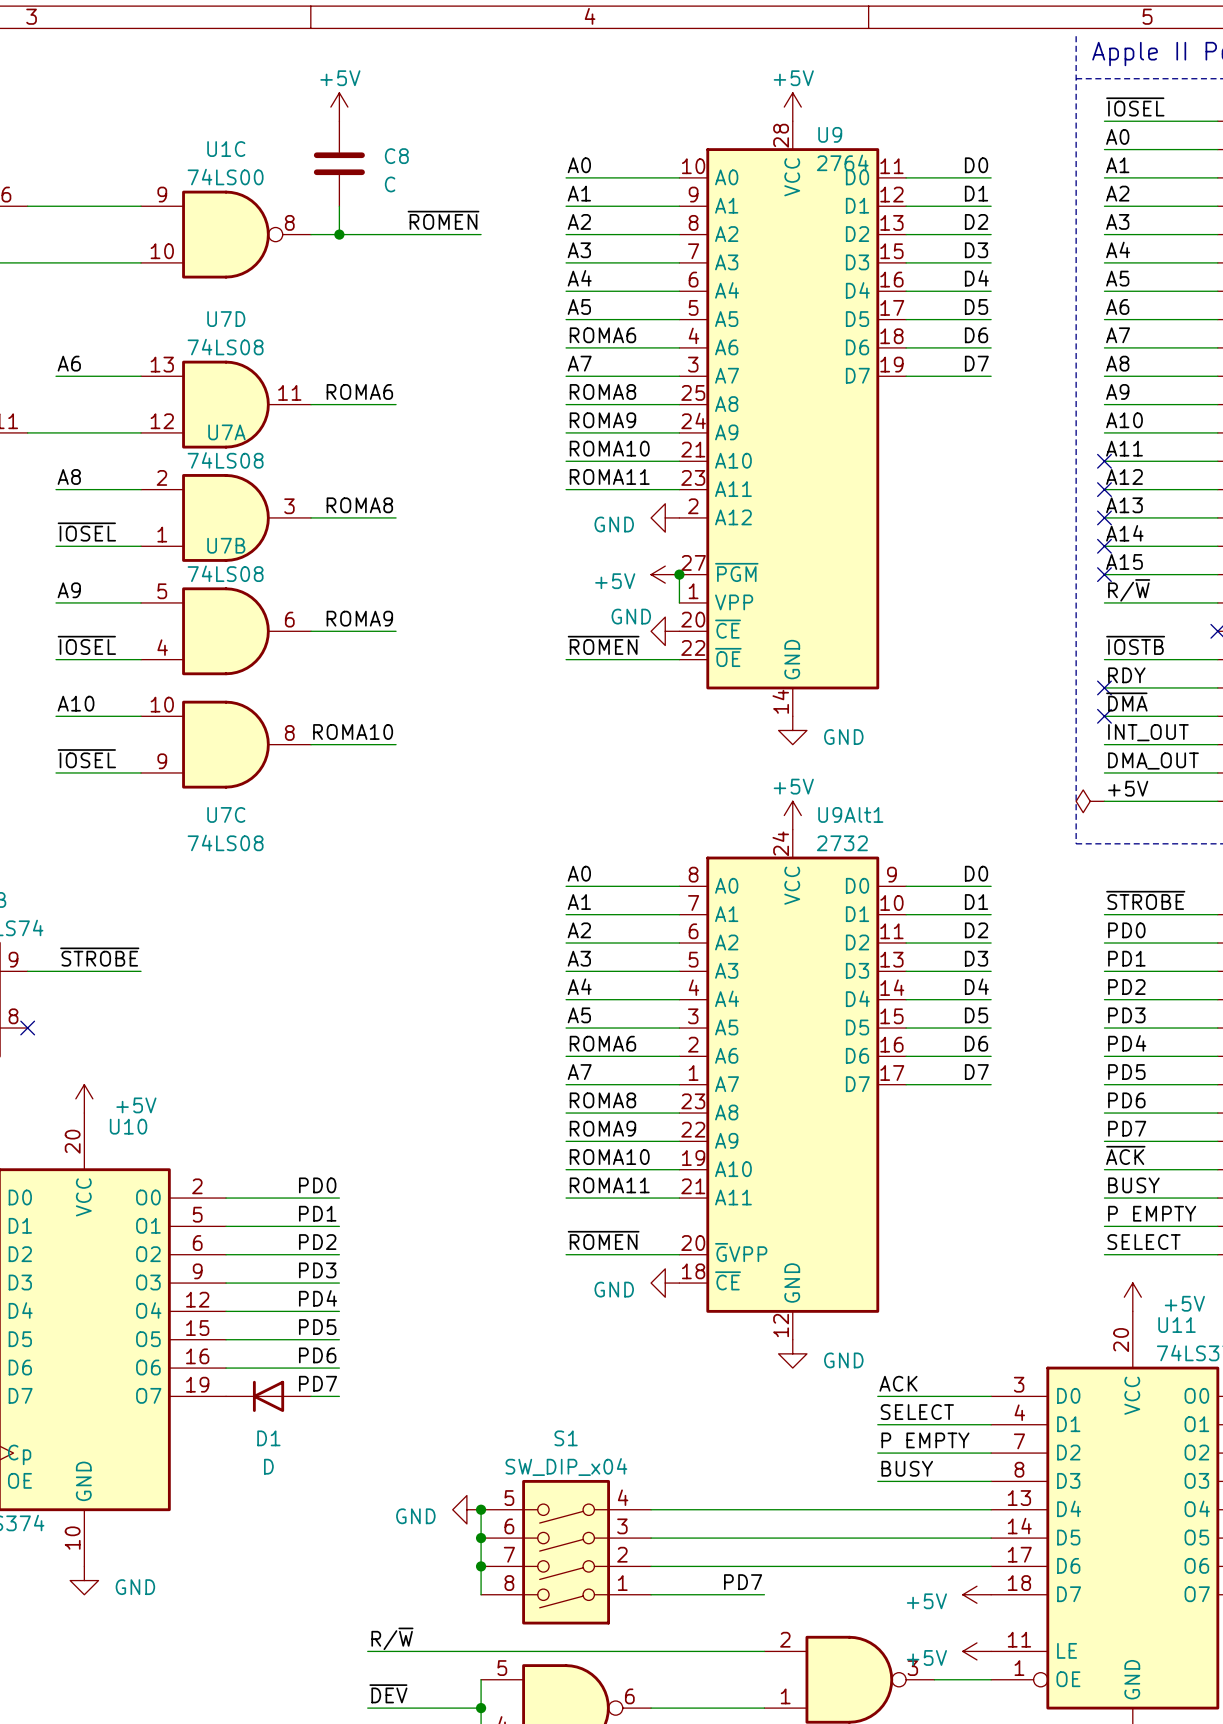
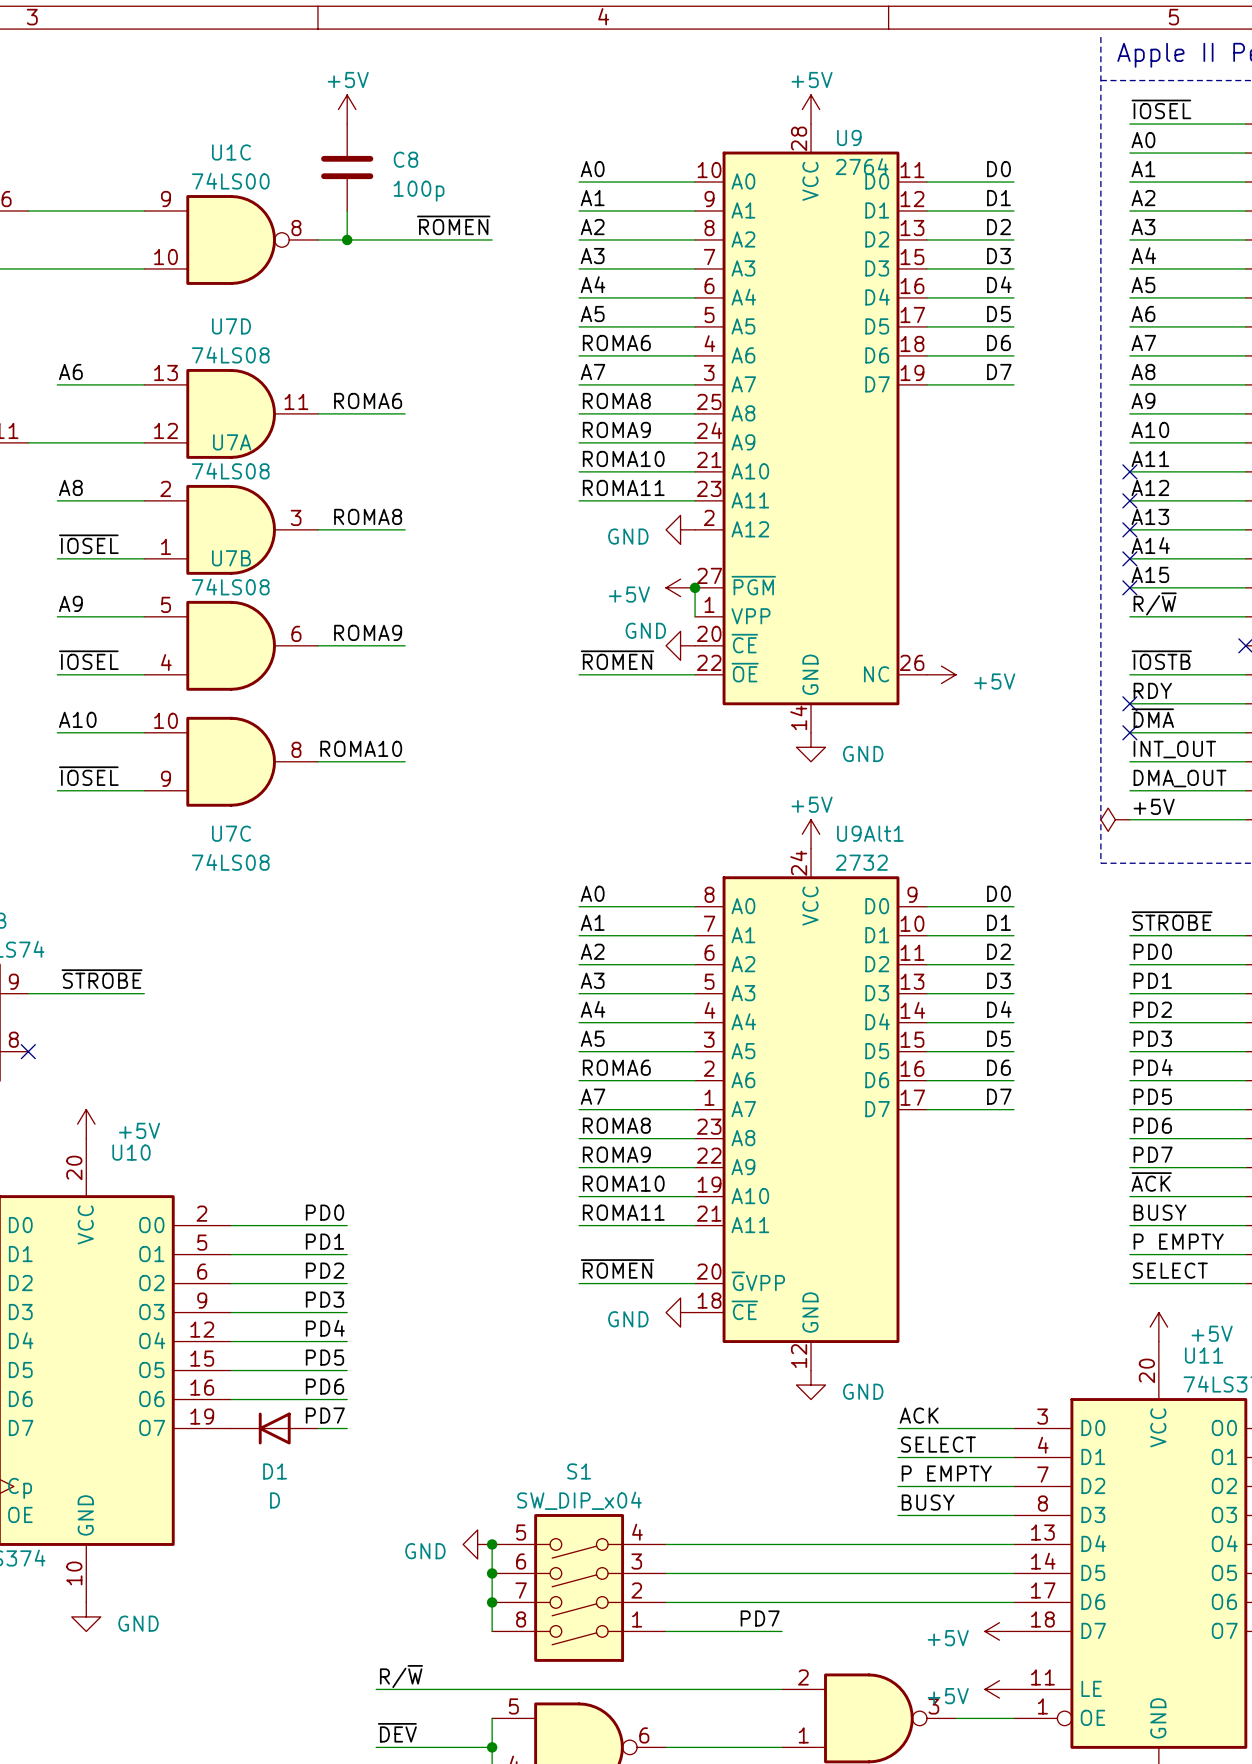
U9 symbol: [679, 121, 907, 717] -> [695, 124, 927, 733]
C8 value: C (390, 184) -> 100p (419, 191)
power symbol: none -> +5V (941, 674)

